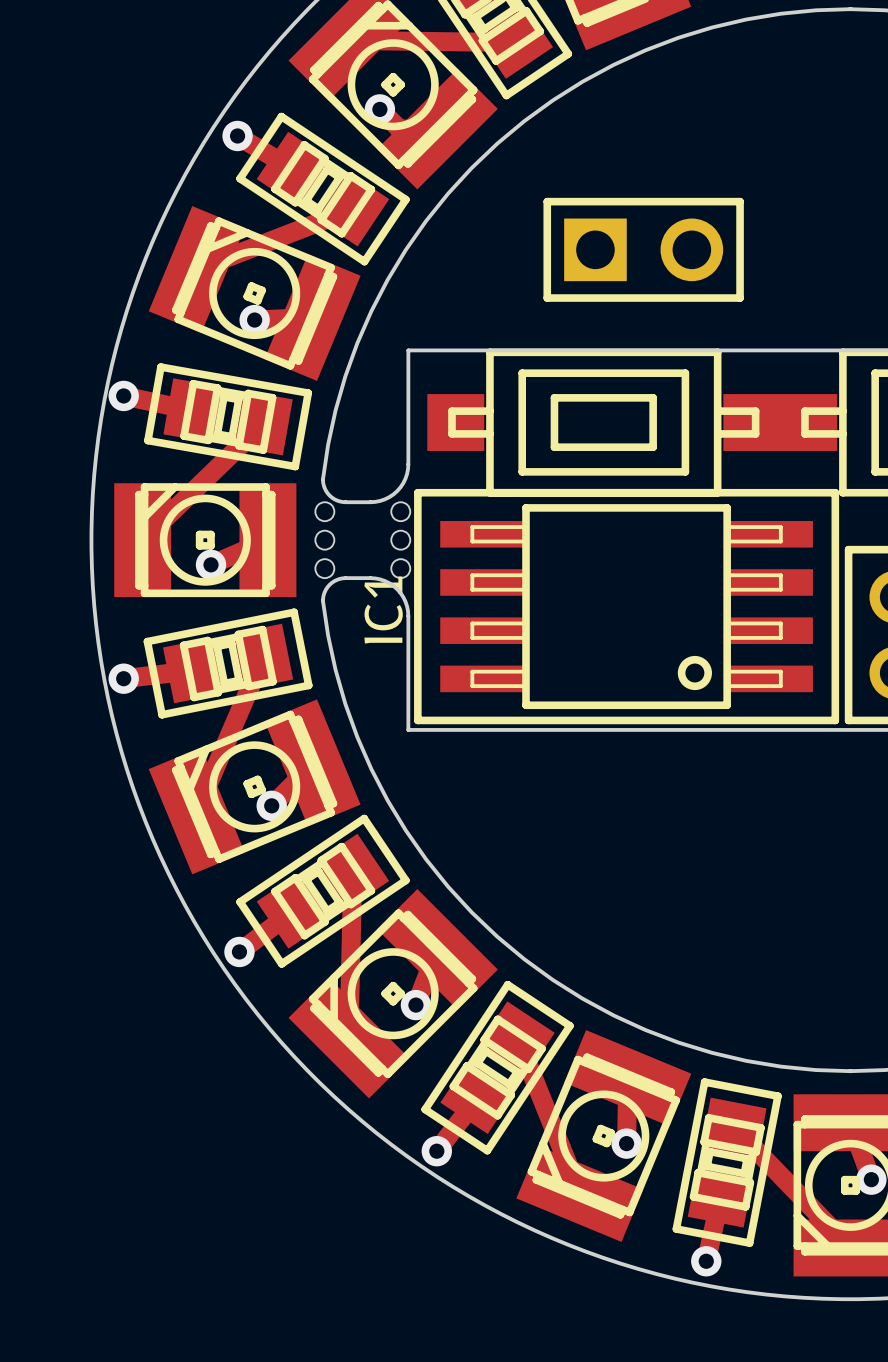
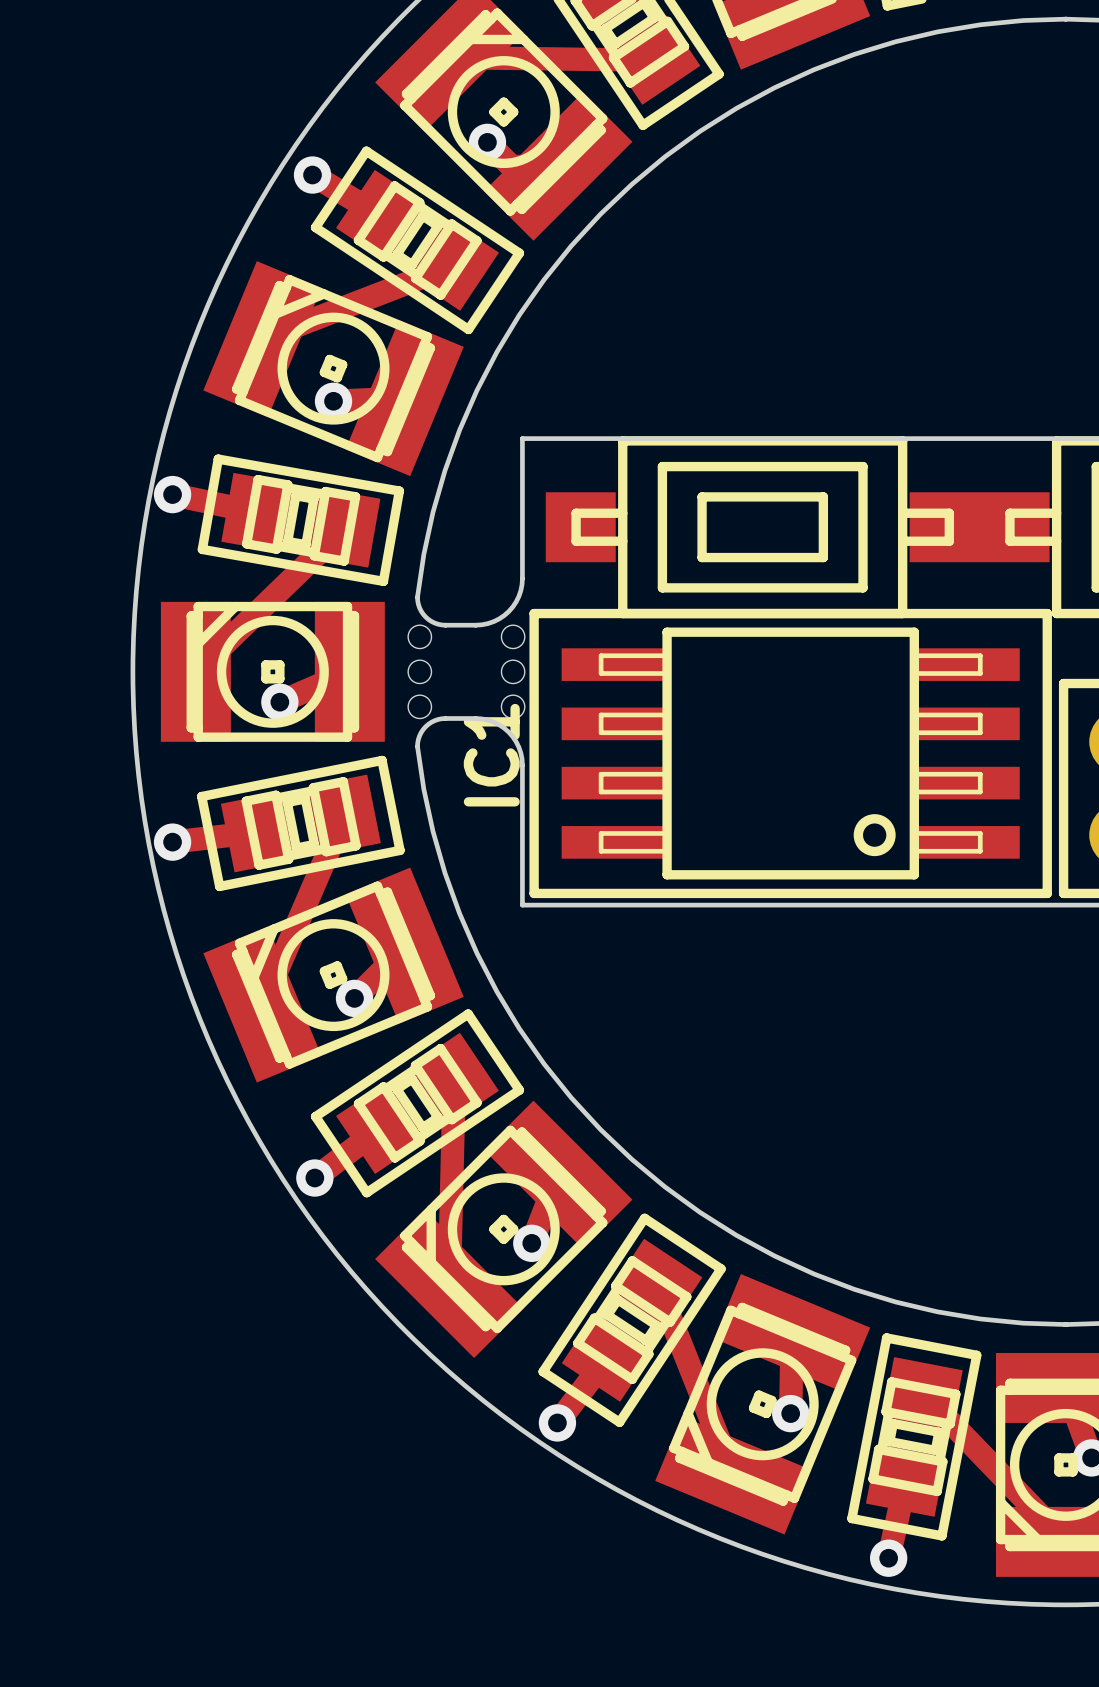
part: (643, 249) -> none

